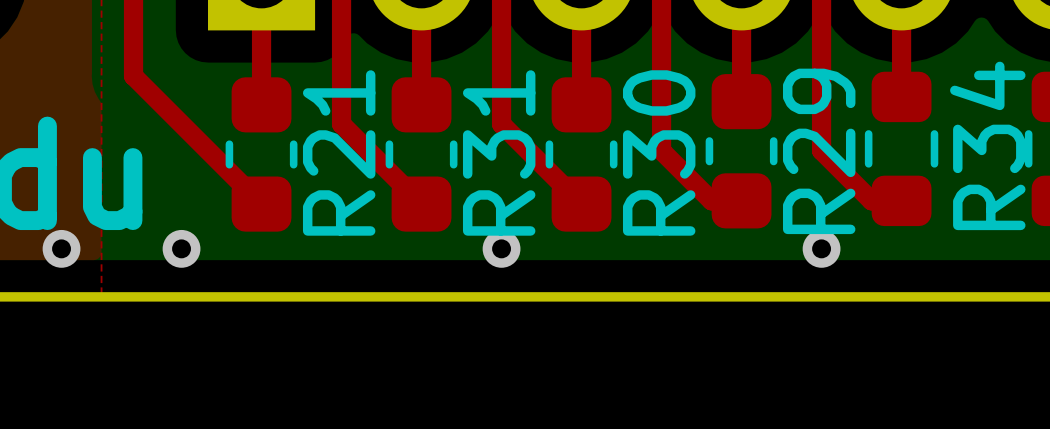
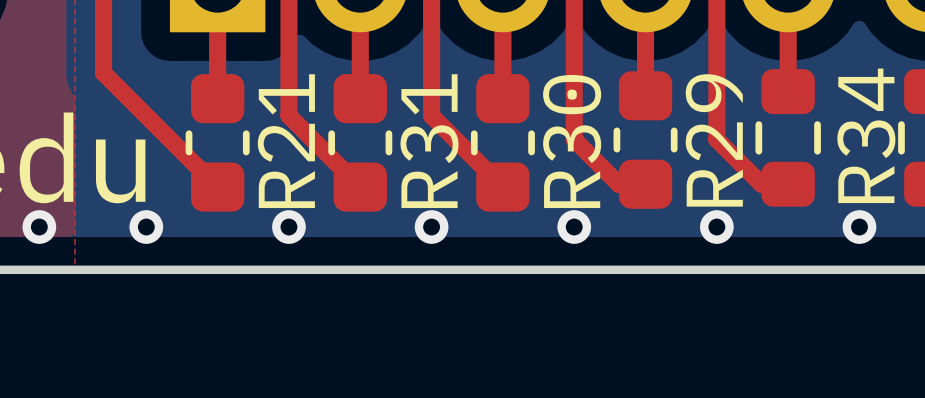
via: none -> (288, 227)
via: none -> (574, 227)
via: none -> (859, 227)

